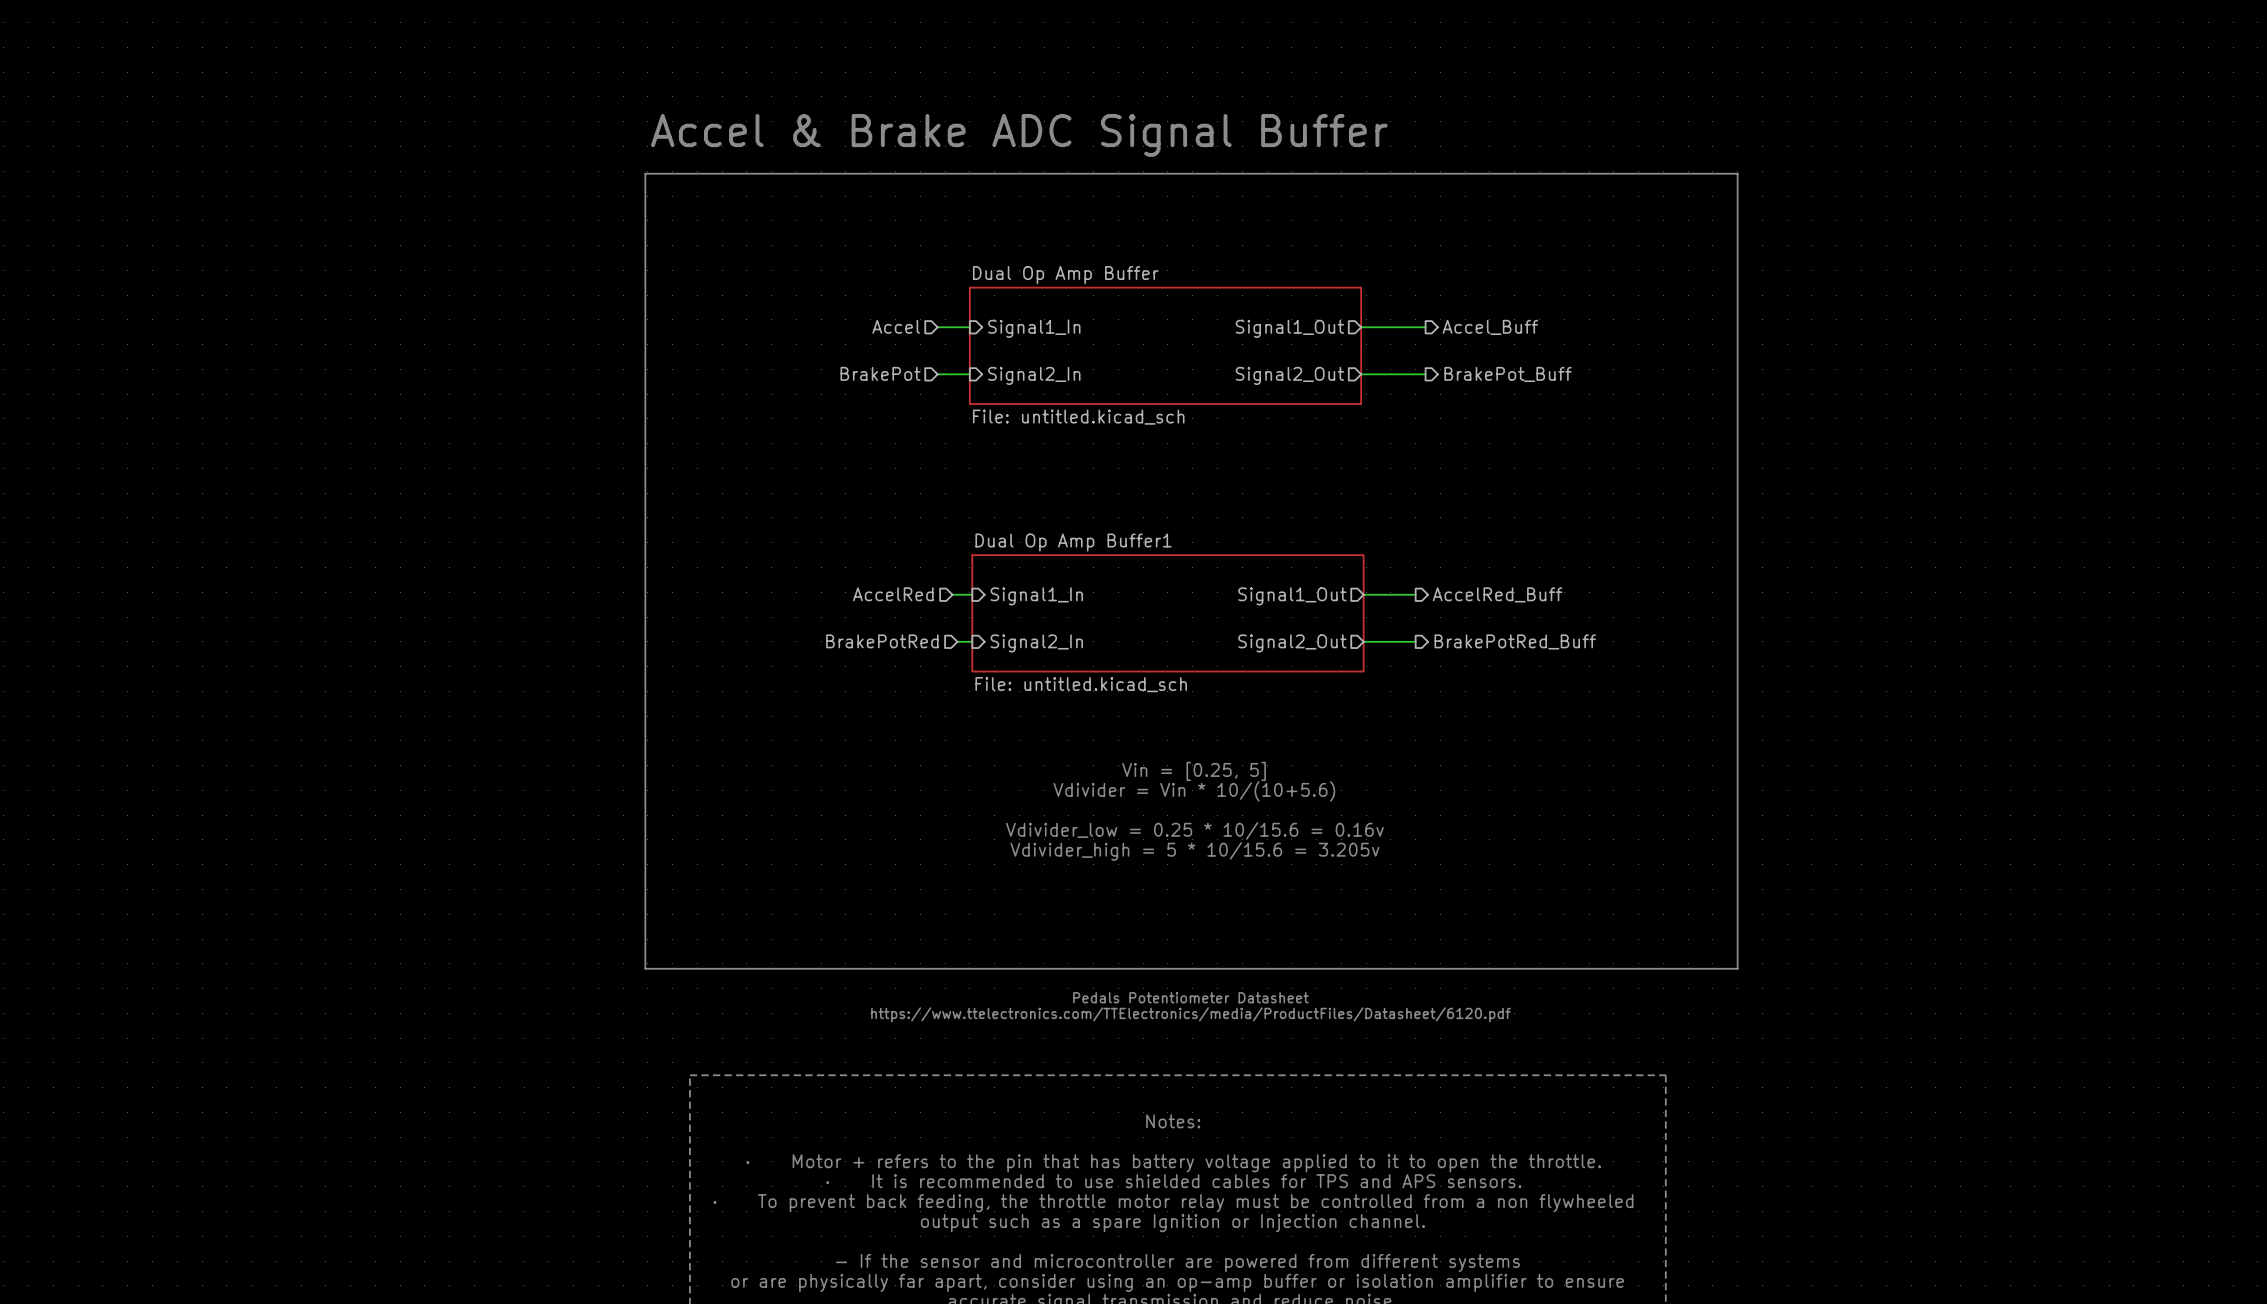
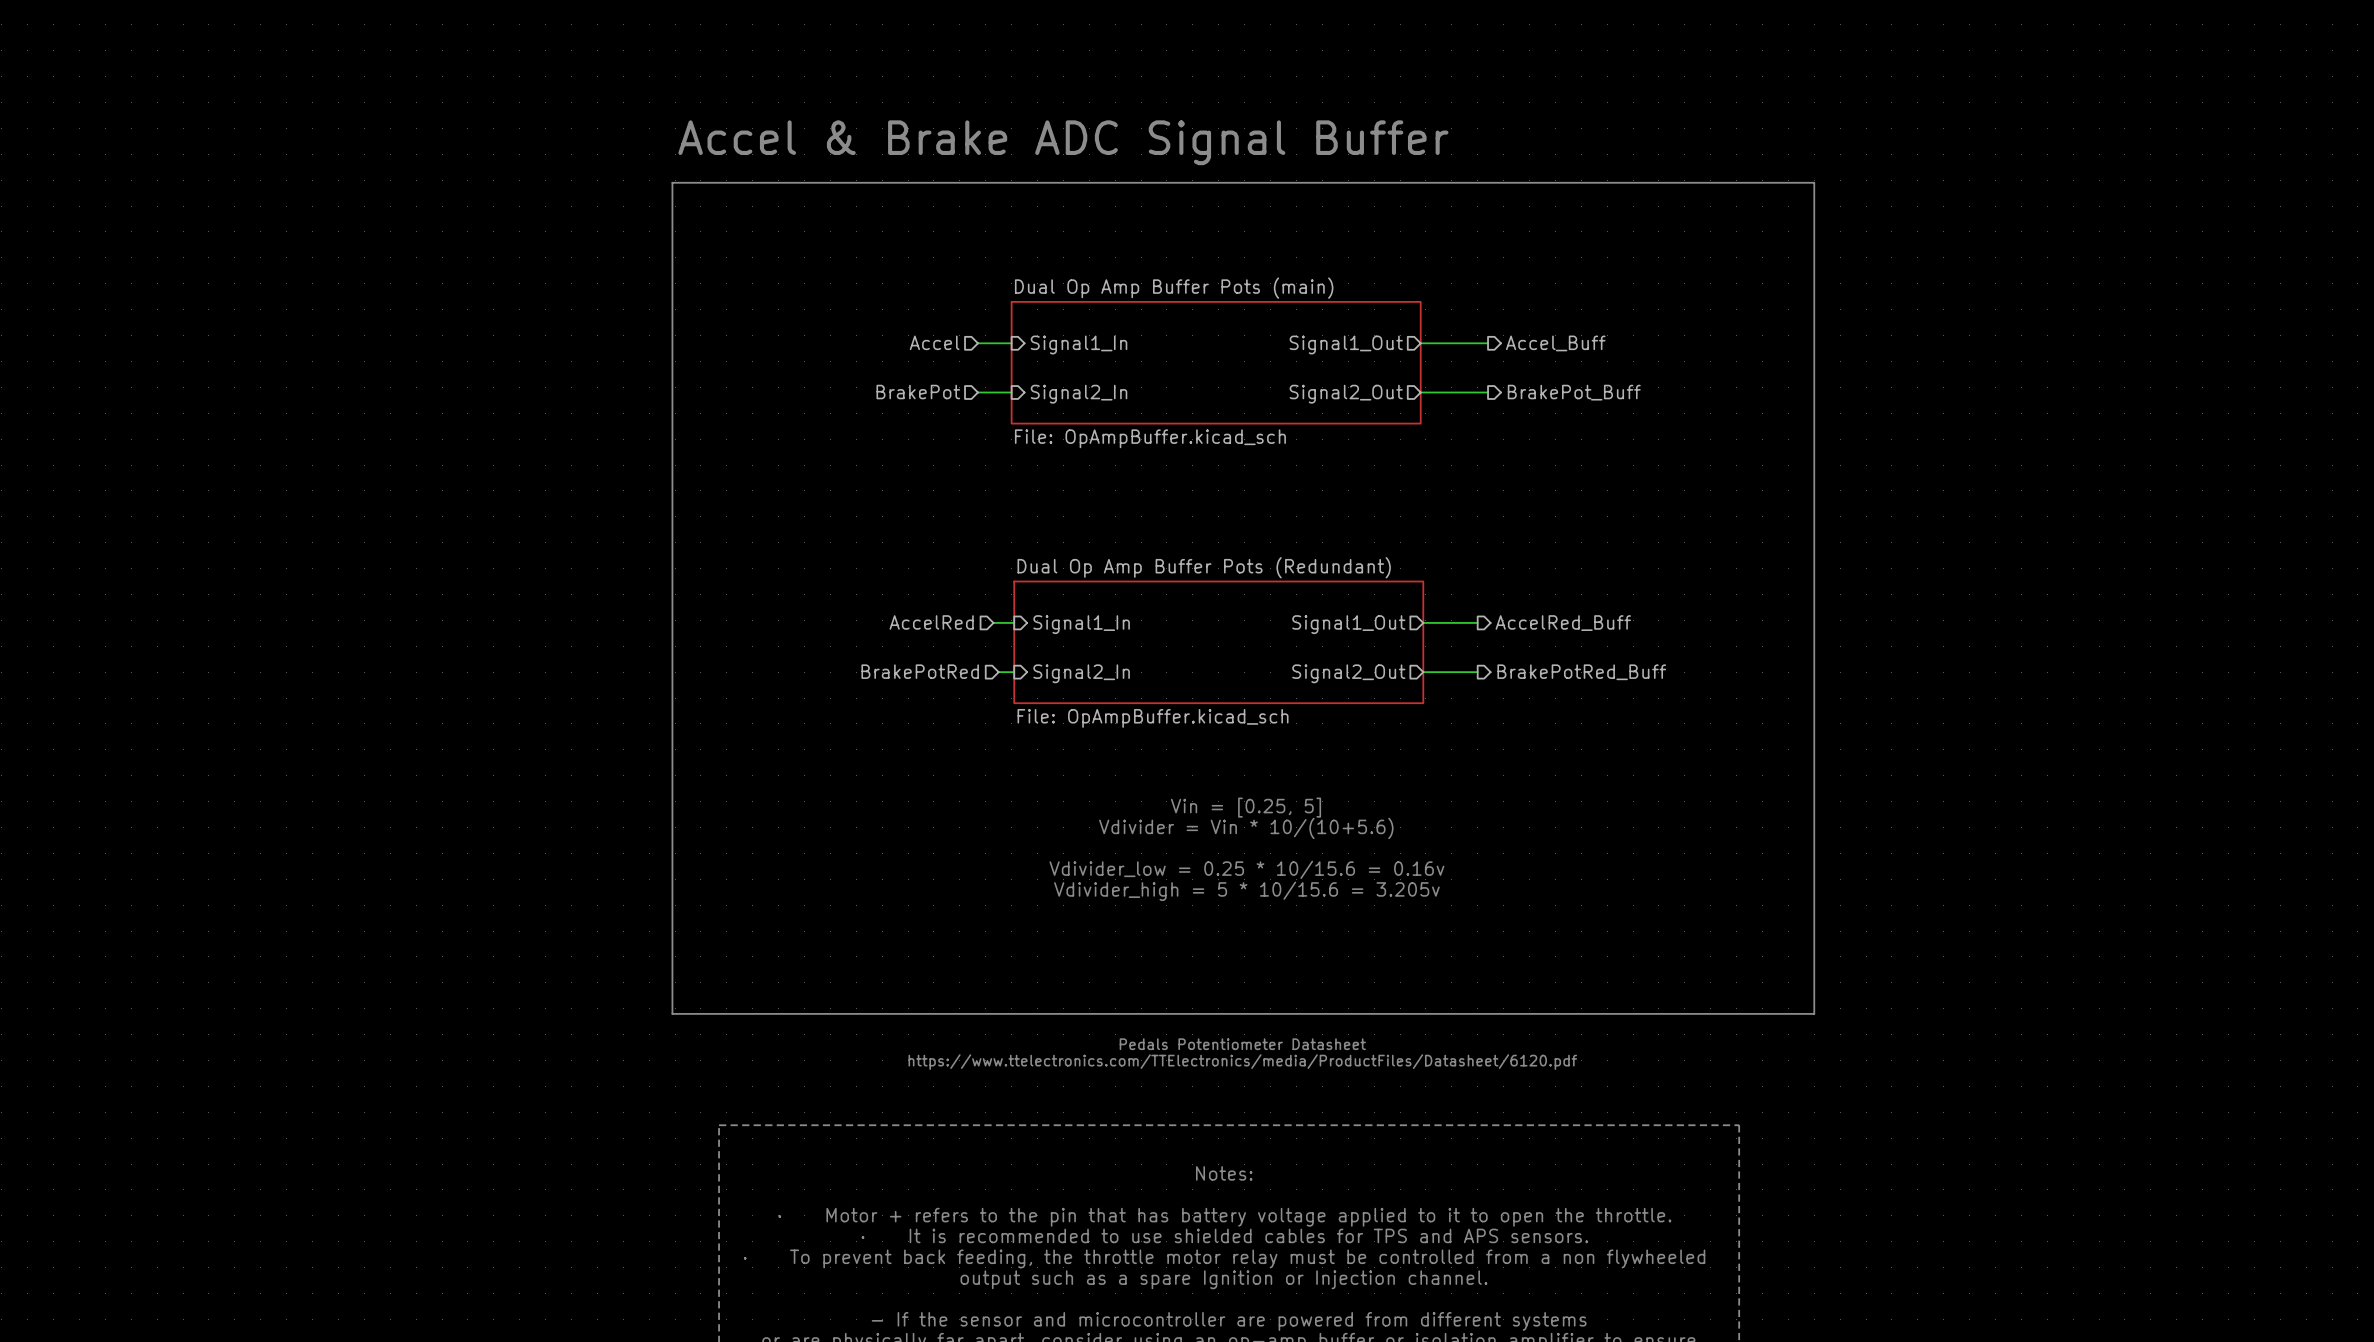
sheet Dual Op Amp Buffer name: Dual Op Amp Buffer (1065, 275) -> Dual Op Amp Buffer Pots (main) (1174, 288)
sheet Dual Op Amp Buffer value: File: untitled.kicad_sch (1078, 417) -> File: OpAmpBuffer.kicad_sch (1150, 438)
sheet Dual Op Amp Buffer1 name: Dual Op Amp Buffer1 (1073, 542) -> Dual Op Amp Buffer Pots (Redundant) (1204, 567)
sheet Dual Op Amp Buffer1 value: File: untitled.kicad_sch (1081, 684) -> File: OpAmpBuffer.kicad_sch (1153, 718)

